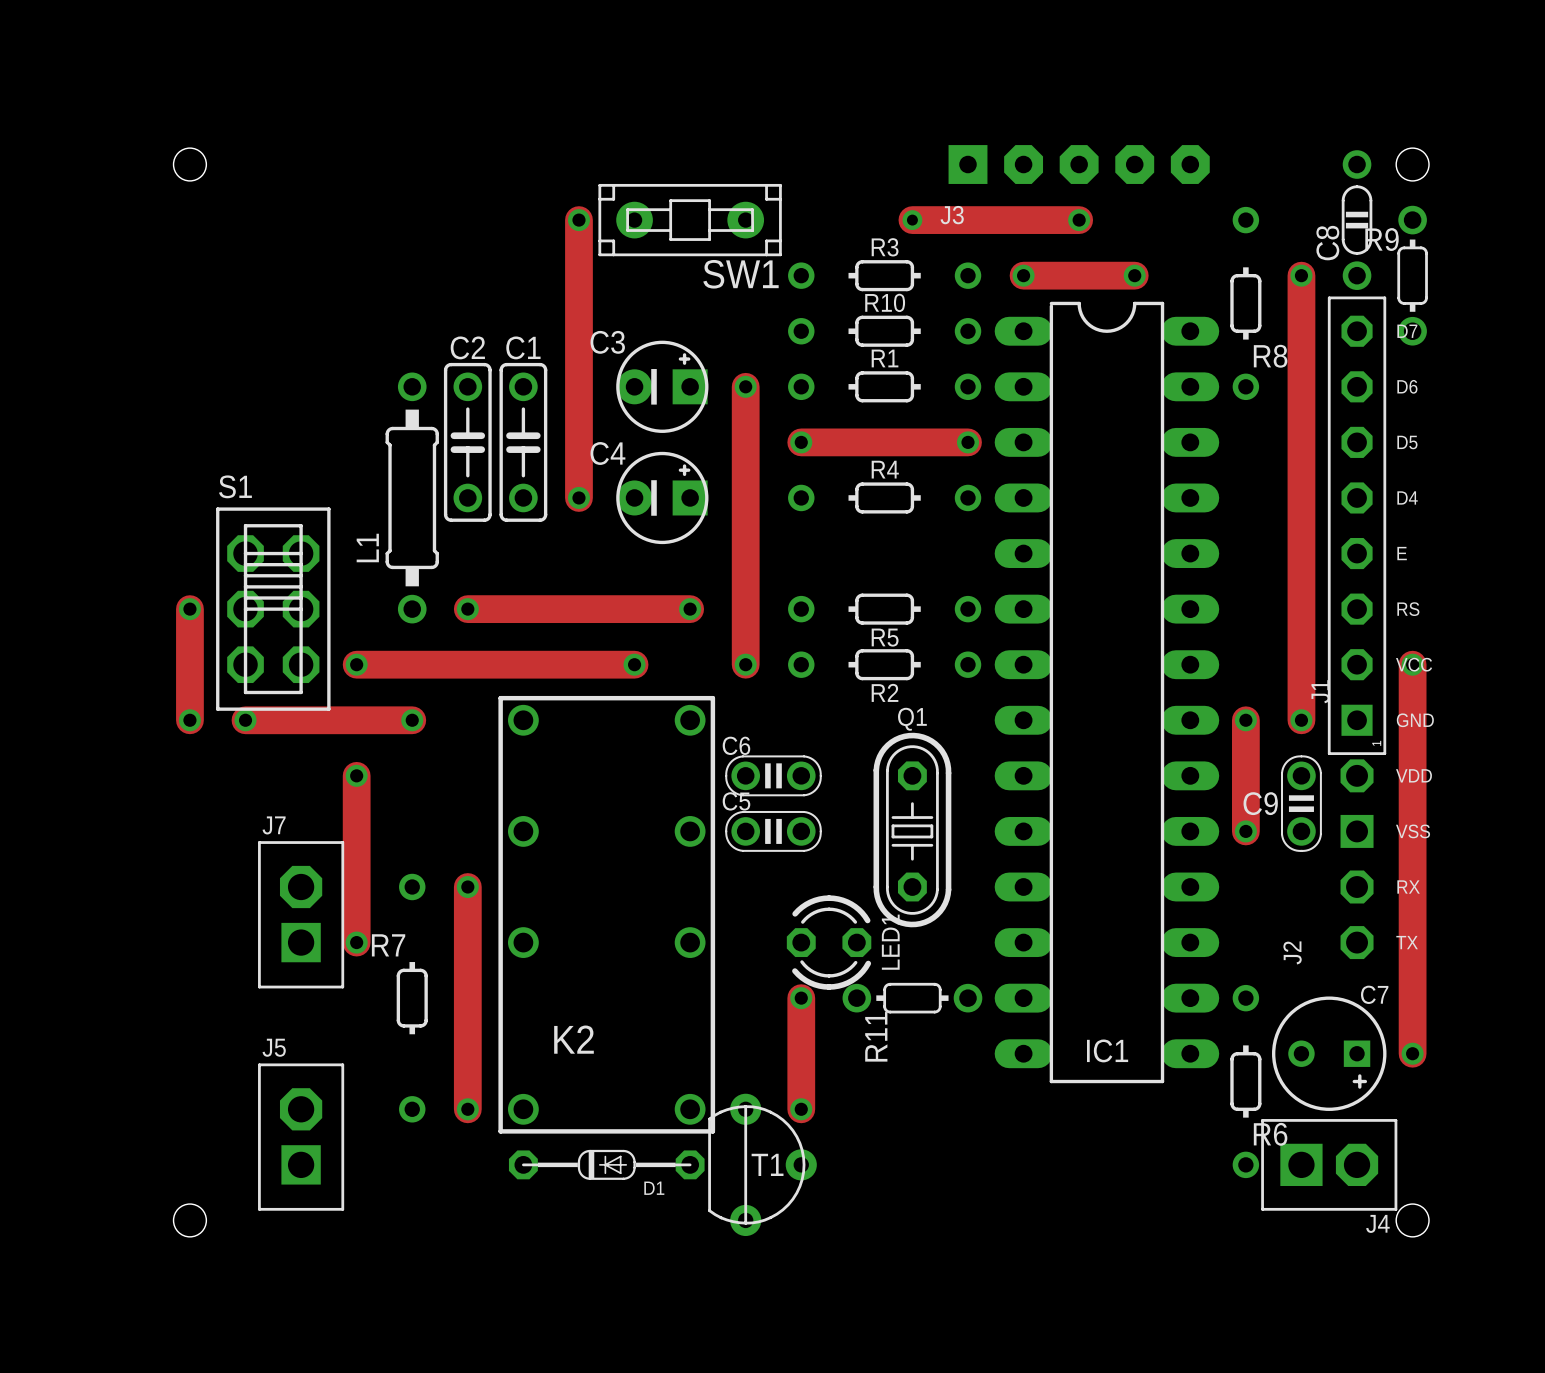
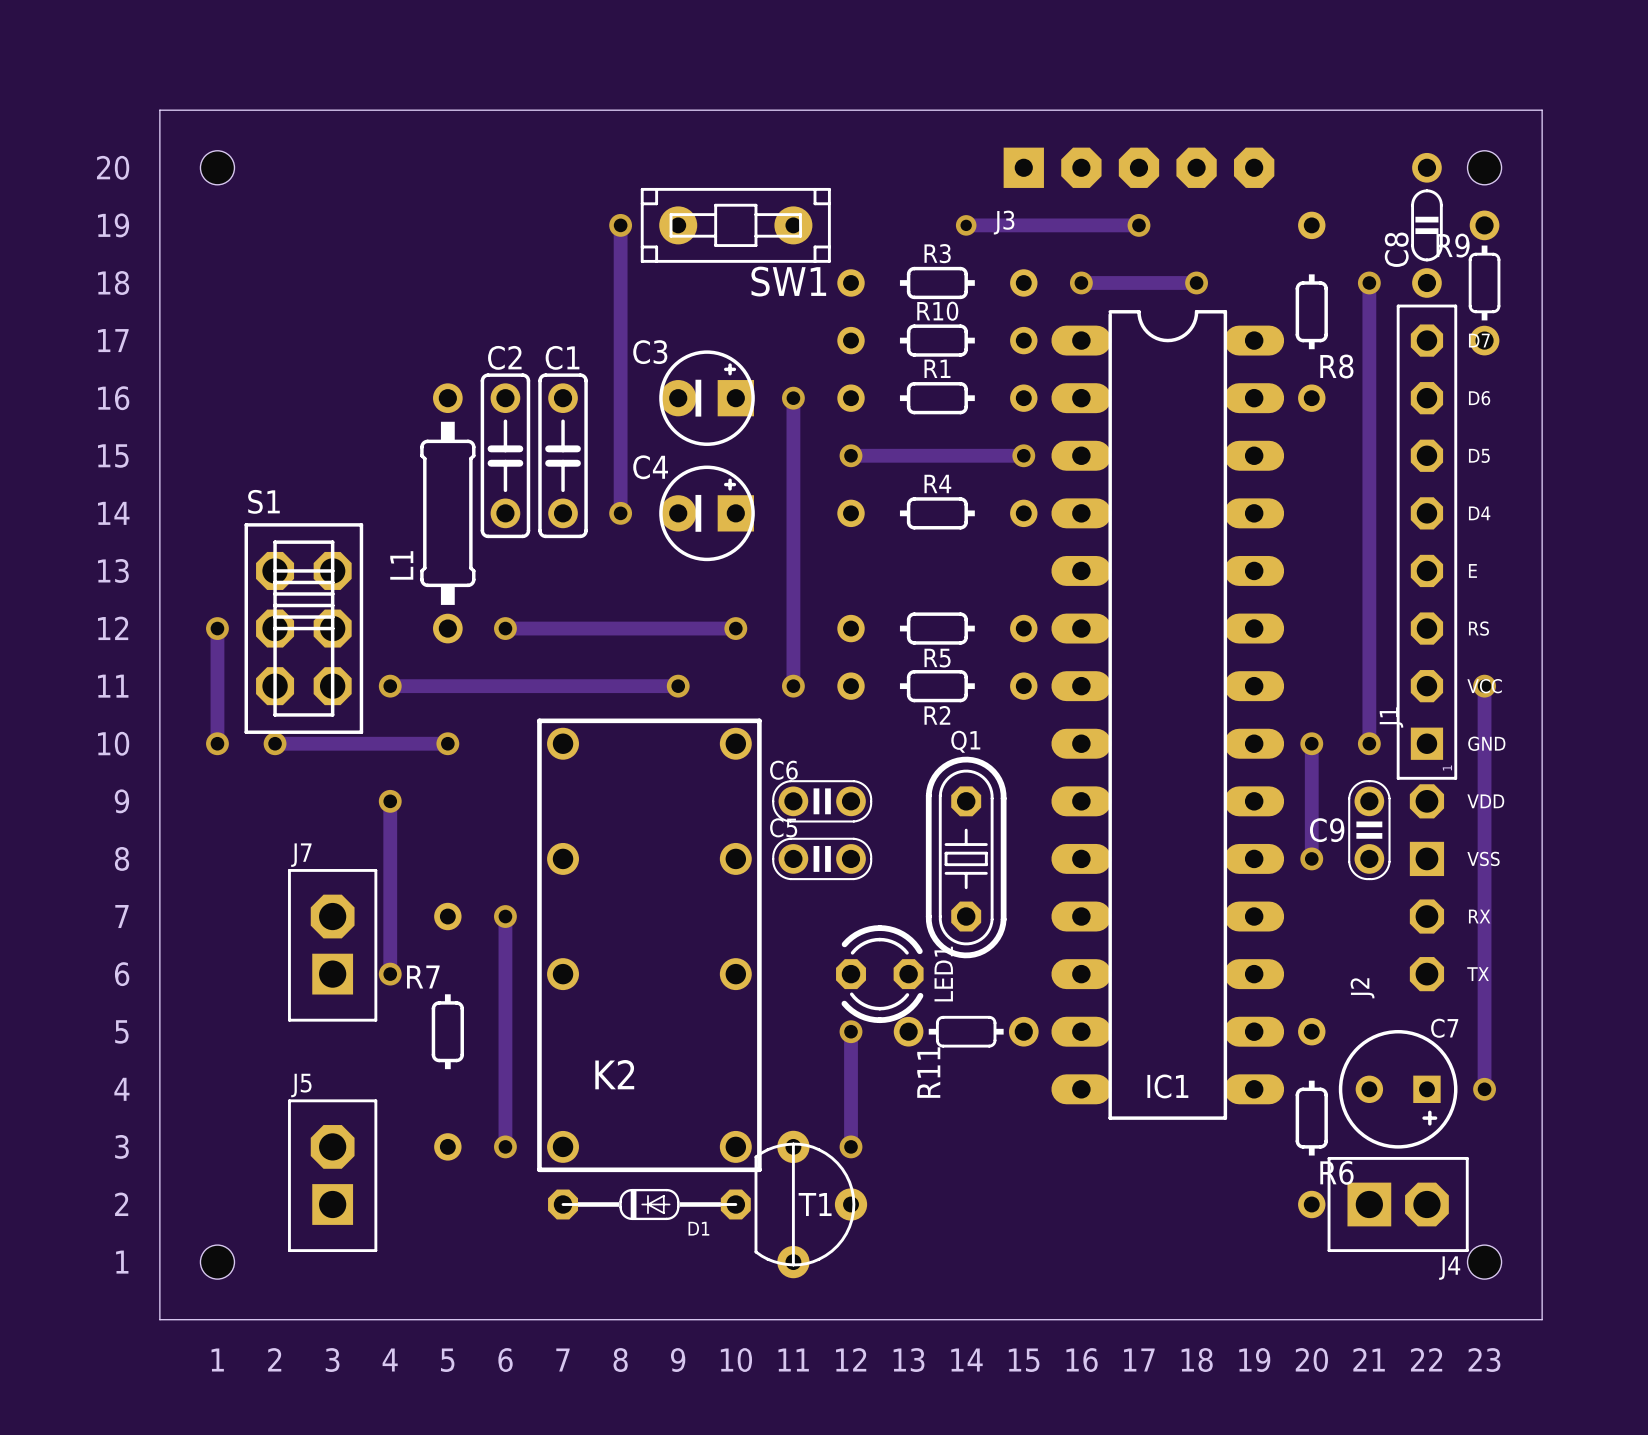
board edge: none -> (159, 110) (1542, 110) (1542, 1319) (159, 1319) (159, 110)
text: none -> 20 (113, 167)
text: none -> 19 (113, 225)
track width: thick (578, 220) (578, 497) -> thin (620, 225) (620, 513)
track width: thick (912, 220) (1079, 220) -> thin (966, 225) (1138, 225)
text: none -> 18 (113, 283)
track width: thick (1023, 275) (1134, 275) -> thin (1081, 282) (1196, 282)
track width: thick (1301, 275) (1301, 720) -> thin (1369, 282) (1369, 743)
text: none -> 17 (113, 340)
text: none -> 16 (113, 398)
track width: thick (745, 386) (745, 664) -> thin (793, 398) (793, 686)
text: none -> 15 (113, 455)
track width: thick (801, 442) (968, 442) -> thin (851, 455) (1023, 455)
text: none -> 14 (113, 513)
text: none -> 13 (113, 570)
text: none -> 12 (113, 628)
track width: thick (189, 609) (189, 720) -> thin (217, 628) (217, 743)
track width: thick (467, 609) (690, 609) -> thin (505, 628) (735, 628)
text: none -> 11 (113, 686)
track width: thick (356, 664) (634, 664) -> thin (390, 686) (678, 686)
track width: thick (1412, 664) (1412, 1053) -> thin (1484, 686) (1484, 1089)
text: none -> 10 (113, 743)
track width: thick (245, 720) (412, 720) -> thin (275, 743) (447, 743)
track width: thick (1245, 720) (1245, 831) -> thin (1311, 743) (1311, 858)
text: none -> 9 (121, 801)
track width: thick (356, 775) (356, 942) -> thin (390, 801) (390, 974)
text: none -> 8 (122, 858)
text: none -> 7 (121, 916)
track width: thick (467, 887) (467, 1109) -> thin (505, 916) (505, 1146)
text: none -> 6 (122, 974)
text: none -> 5 (121, 1031)
track width: thick (801, 998) (801, 1109) -> thin (851, 1031) (851, 1146)
text: none -> 4 (121, 1089)
text: none -> 3 (121, 1146)
text: none -> 2 (121, 1204)
text: none -> 1 (122, 1262)
text: none -> 1 (217, 1360)
text: none -> 2 (274, 1359)
text: none -> 3 (332, 1360)
text: none -> 4 (390, 1360)
text: none -> 6 (505, 1360)
text: none -> 7 (562, 1360)
text: none -> 8 (620, 1360)
text: none -> 9 (678, 1360)
text: none -> 10 (736, 1360)
text: none -> 11 (793, 1360)
text: none -> 12 (851, 1359)
text: none -> 13 (909, 1360)
text: none -> 14 (966, 1360)
text: none -> 16 (1082, 1360)
text: none -> 17 (1139, 1360)
text: none -> 18 (1197, 1360)
text: none -> 19 (1254, 1360)
text: none -> 20 (1311, 1360)
text: none -> 21 (1369, 1359)
text: none -> 22 (1426, 1359)
text: none -> 23 (1484, 1360)
text: none -> 5 (447, 1360)
text: none -> 15 (1024, 1360)

